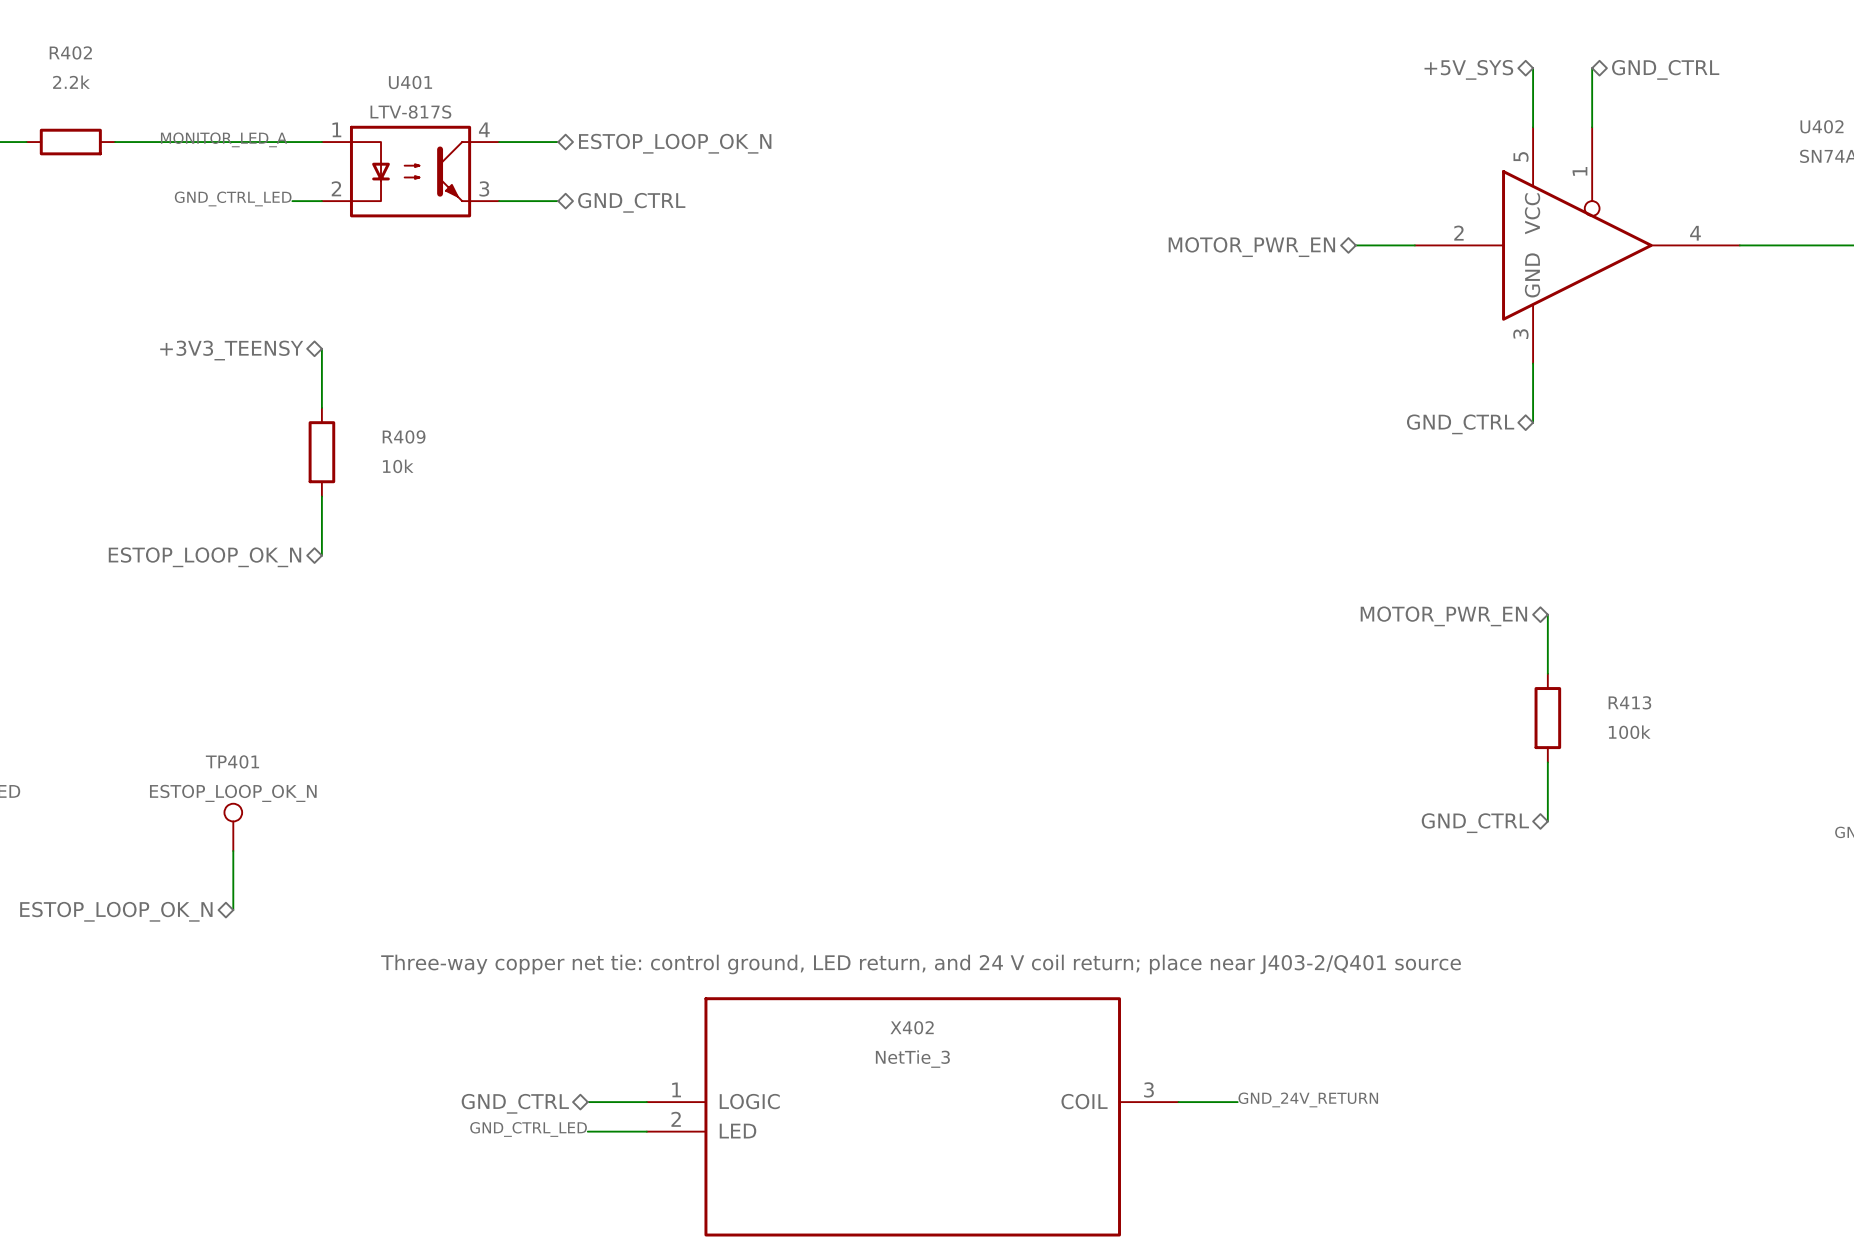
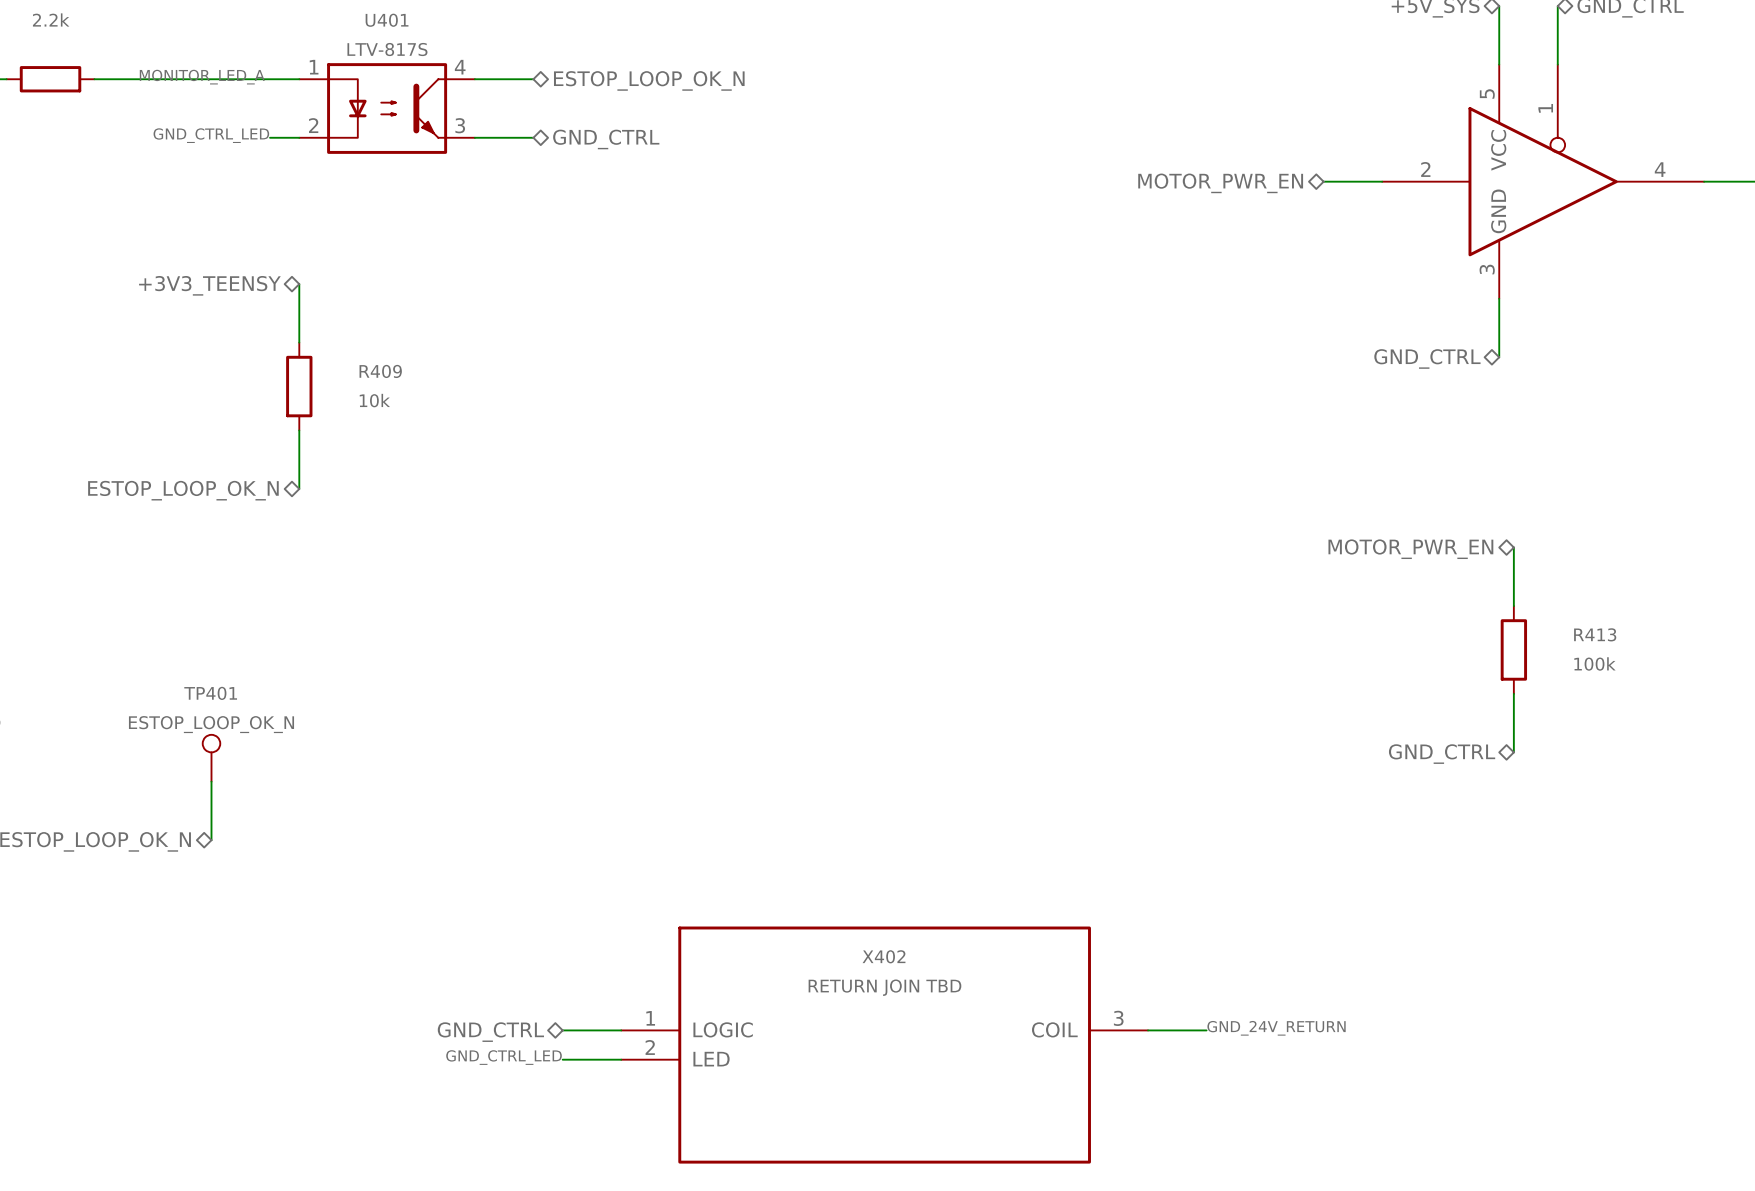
X402 text: Three-way copper net tie: control ground, LED return, and 24 V coil return; place near J403-2/Q401 source (921, 964) -> none
X402 value: NetTie_3 (912, 1059) -> RETURN JOIN TBD (884, 987)

